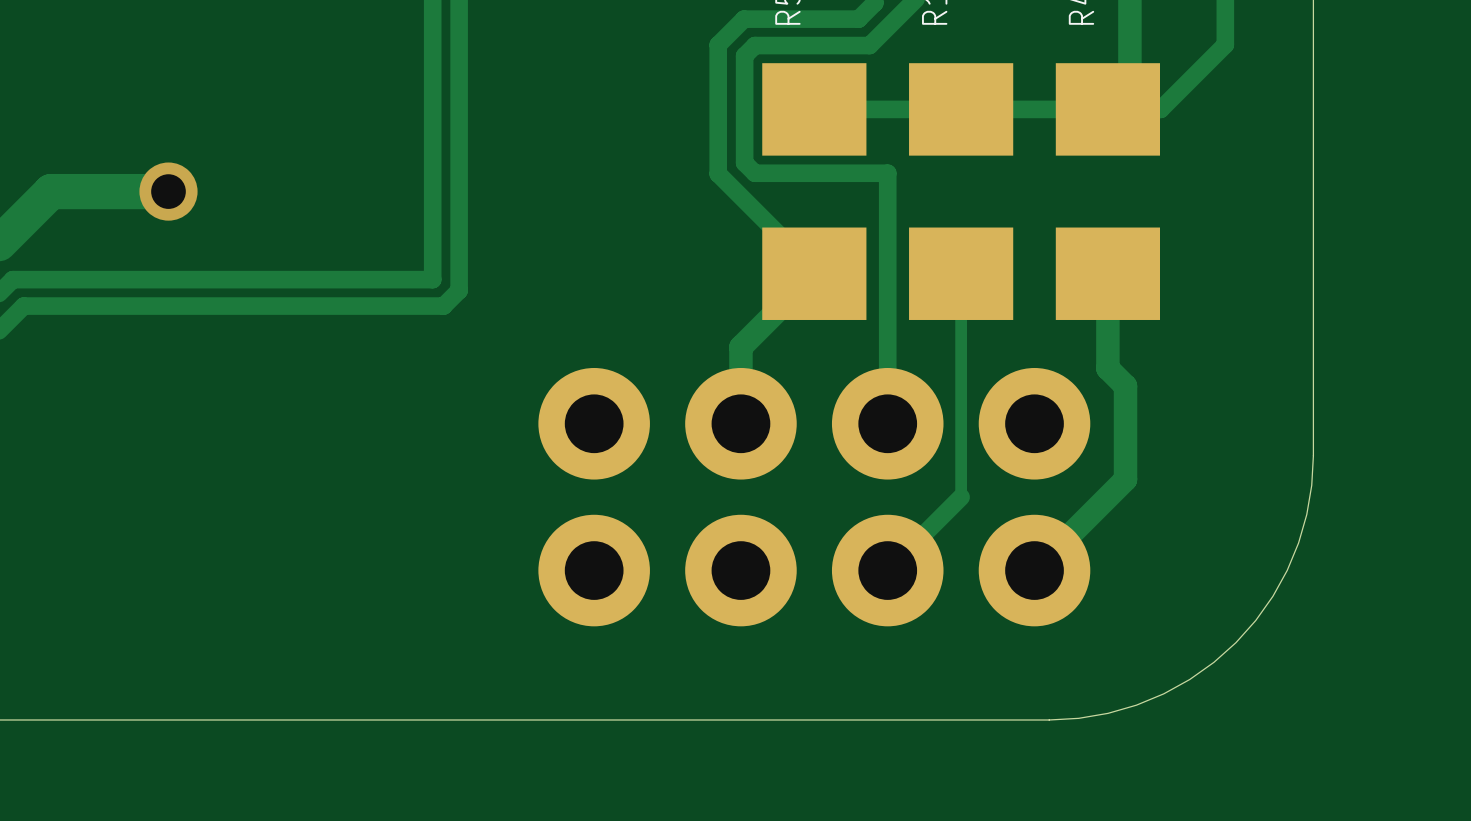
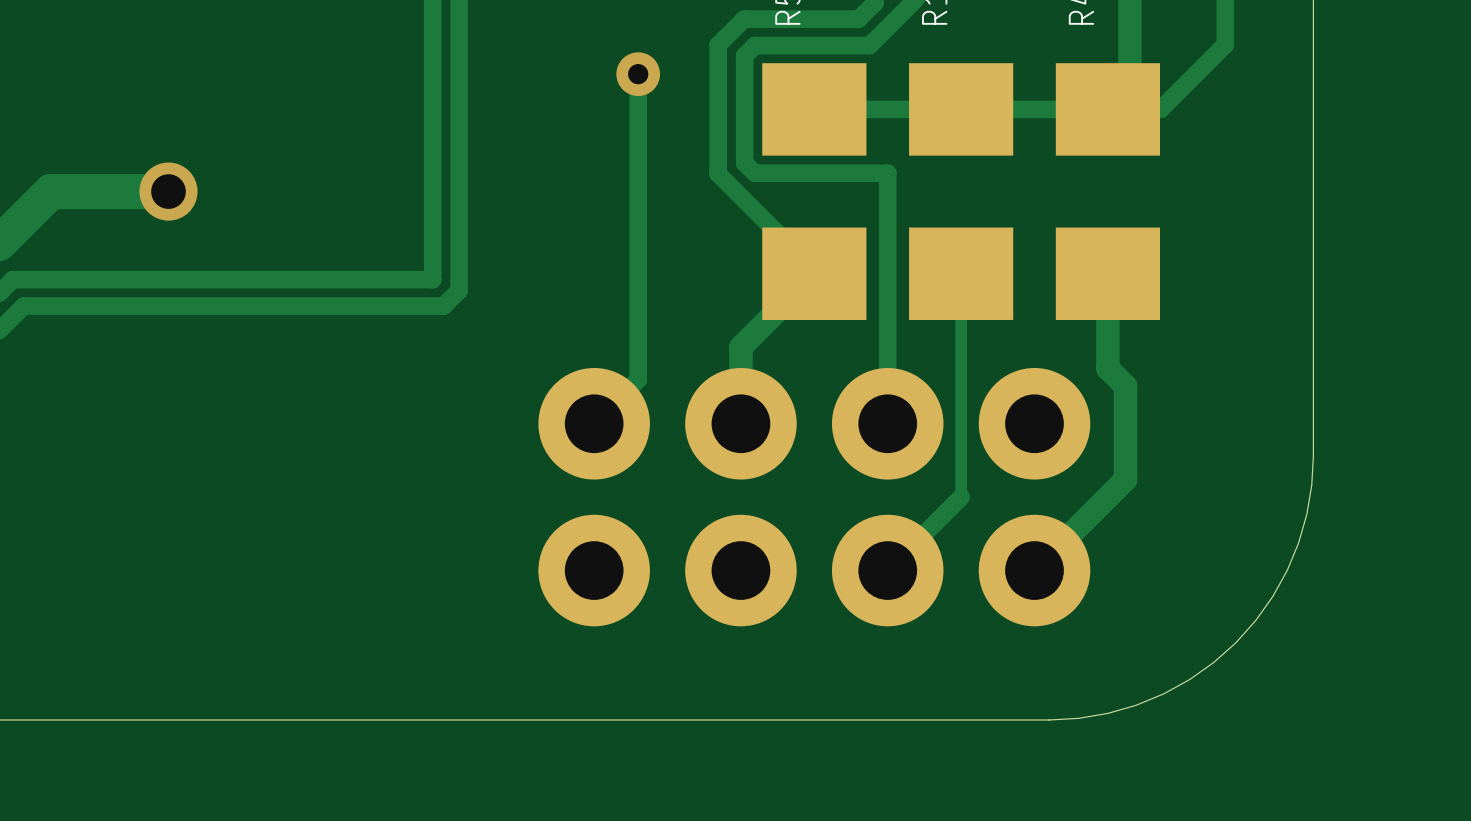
track: none -> (638, 74) (638, 379) (594, 423)
via: none -> (638, 74)

